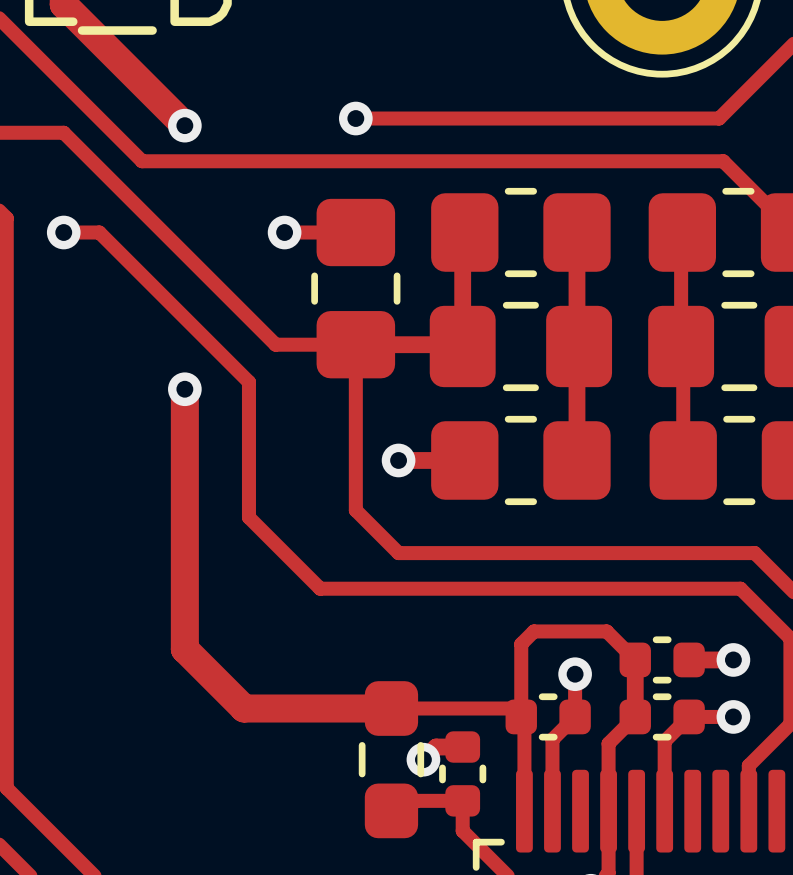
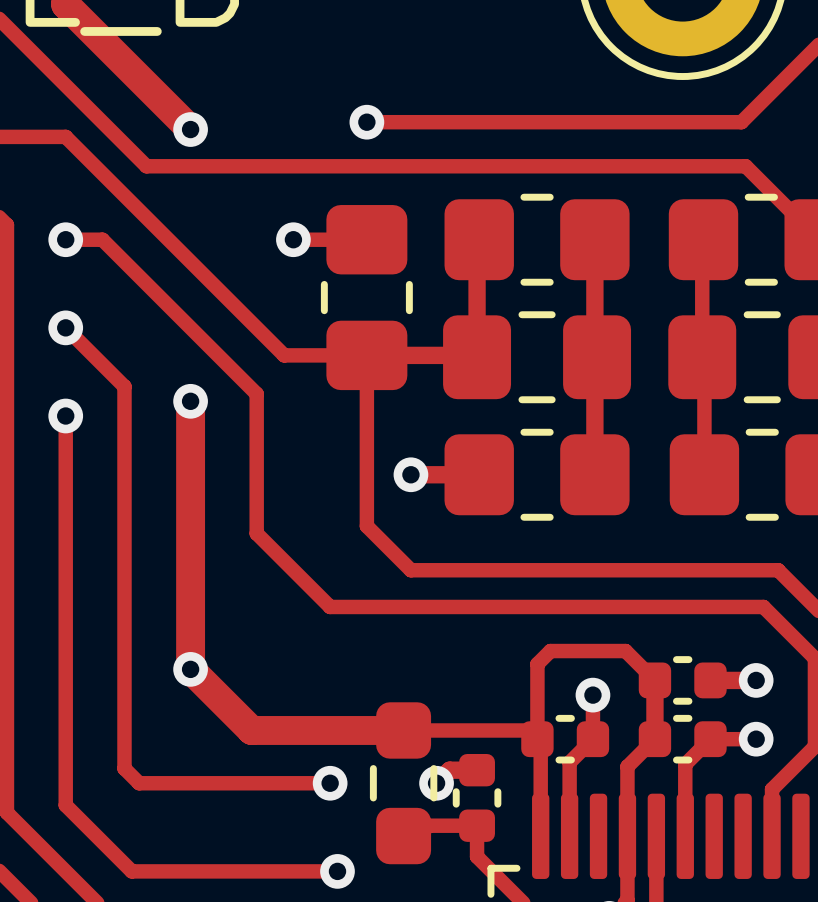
track: none -> (65, 327) (124, 386) (124, 768) (139, 783) (330, 783)
via: none -> (65, 327)
track: none -> (65, 416) (65, 805) (131, 871) (337, 871)
via: none -> (65, 416)
via: none -> (190, 669)
via: none -> (330, 783)
via: none -> (337, 871)

